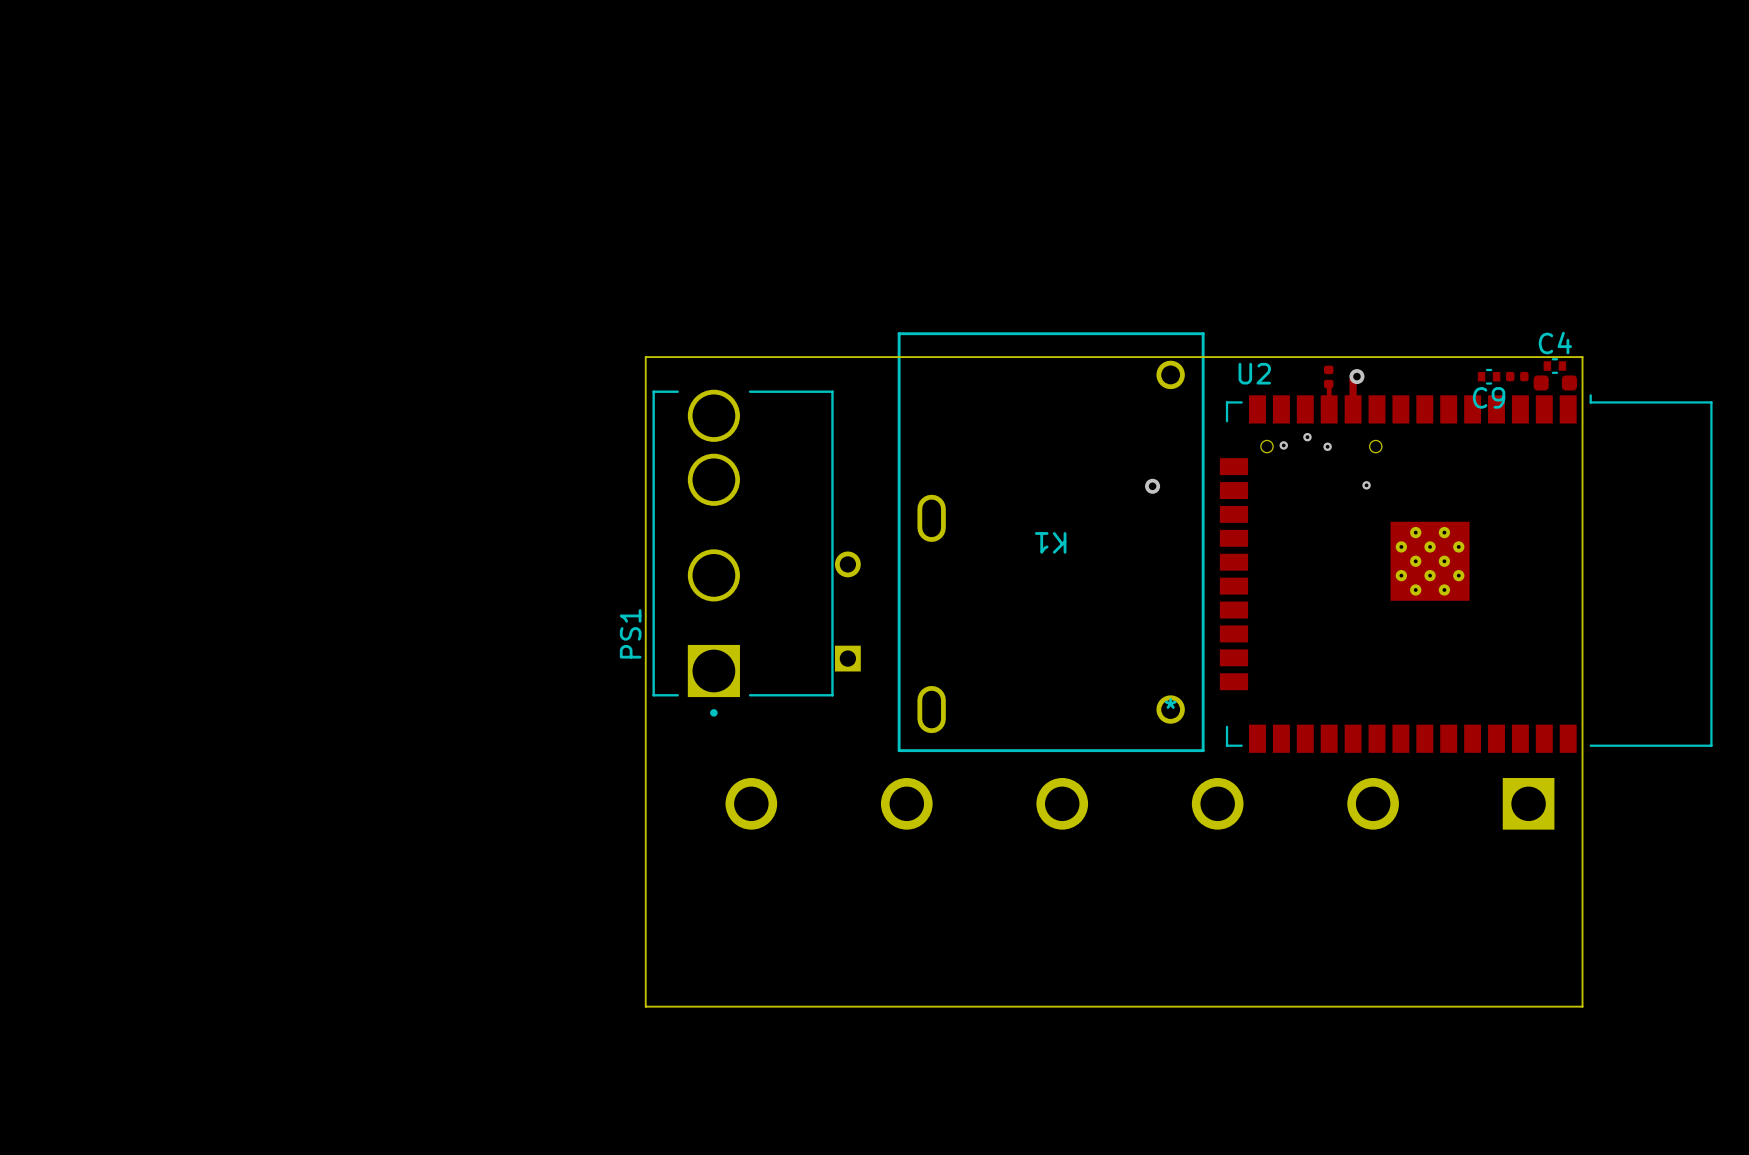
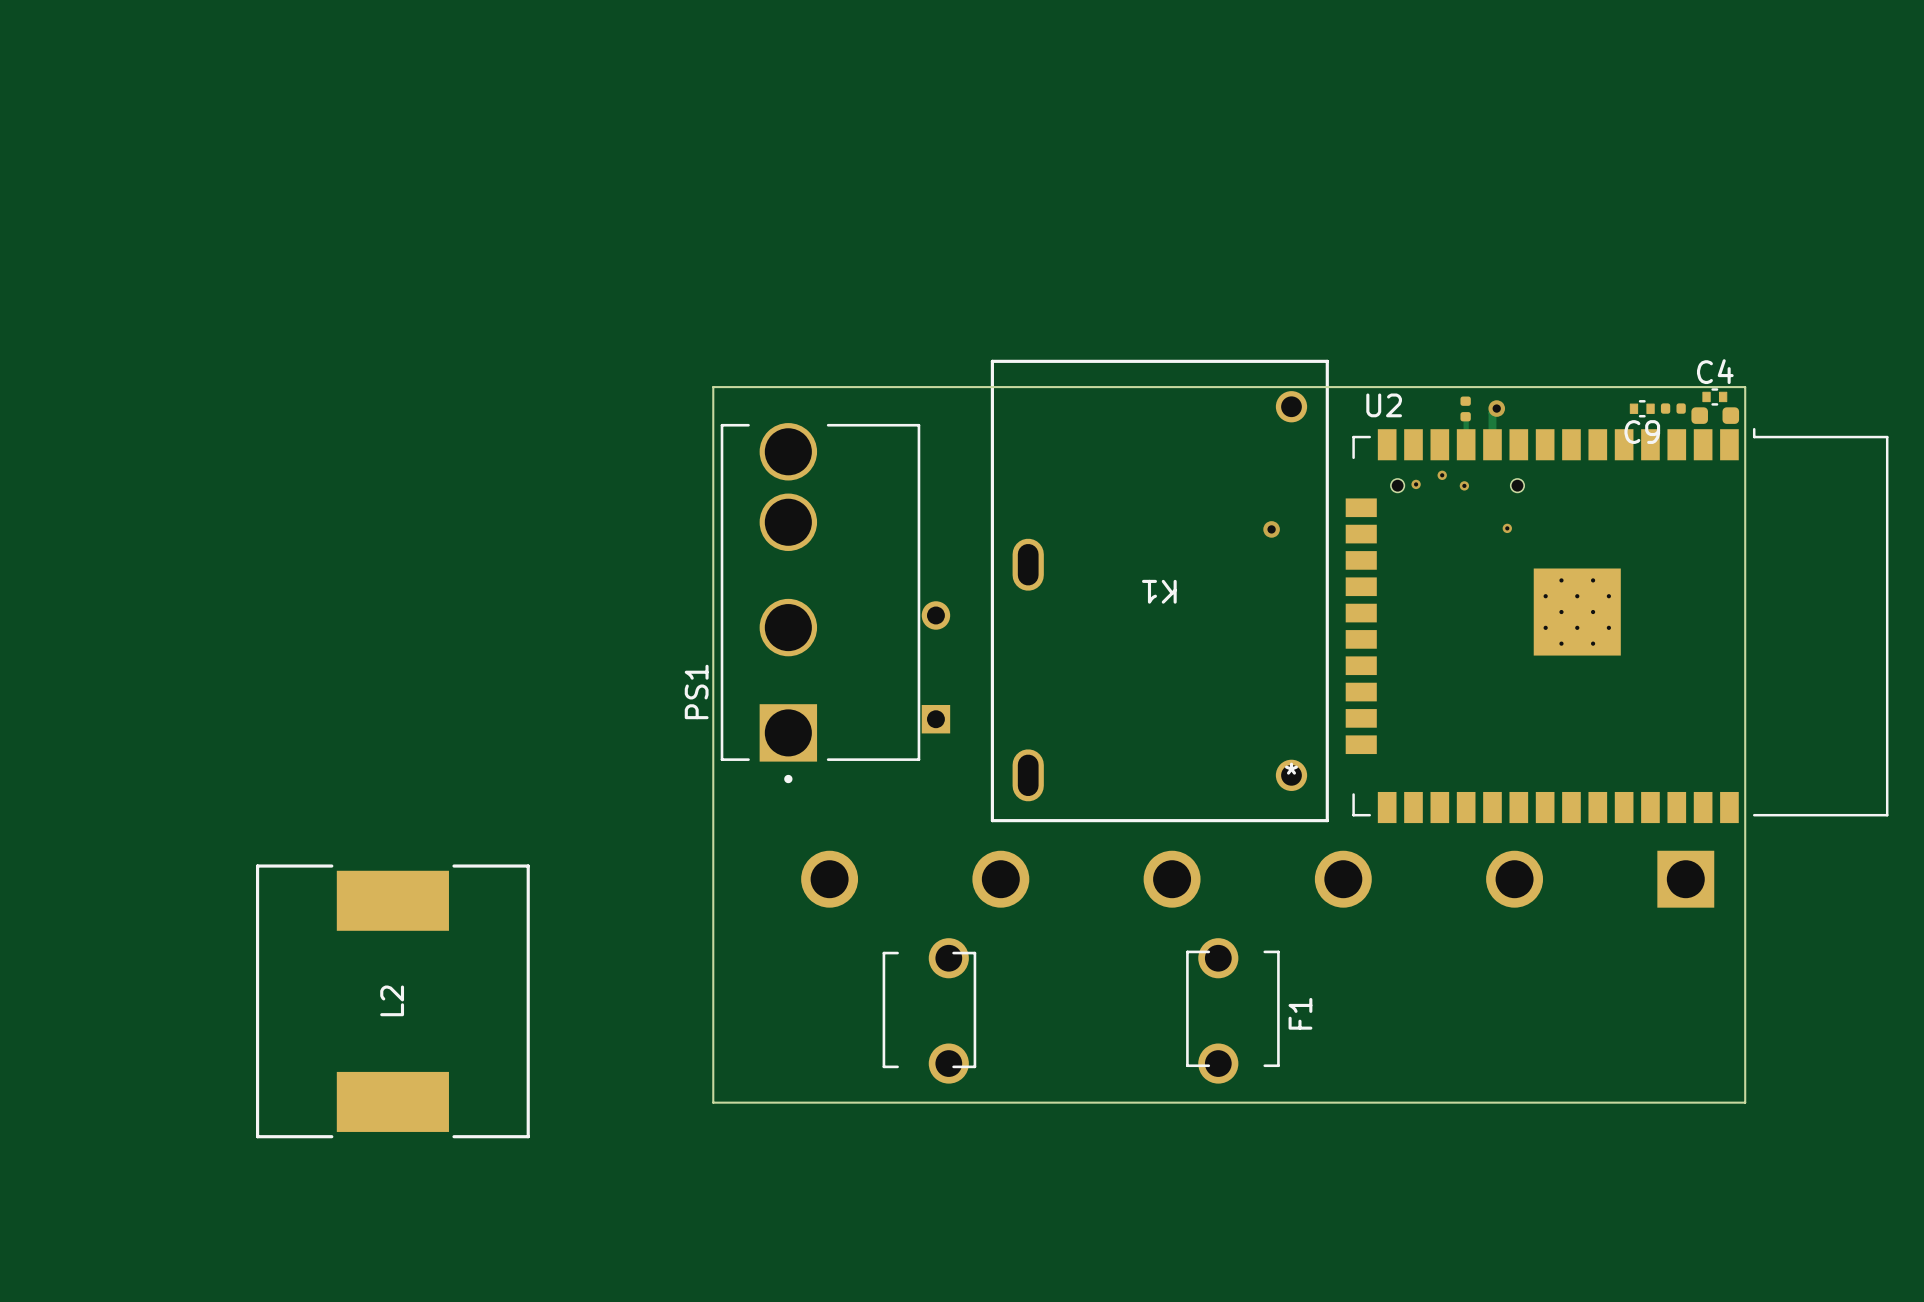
L2: none -> (392, 1001)
F1: none -> (1081, 1010)

